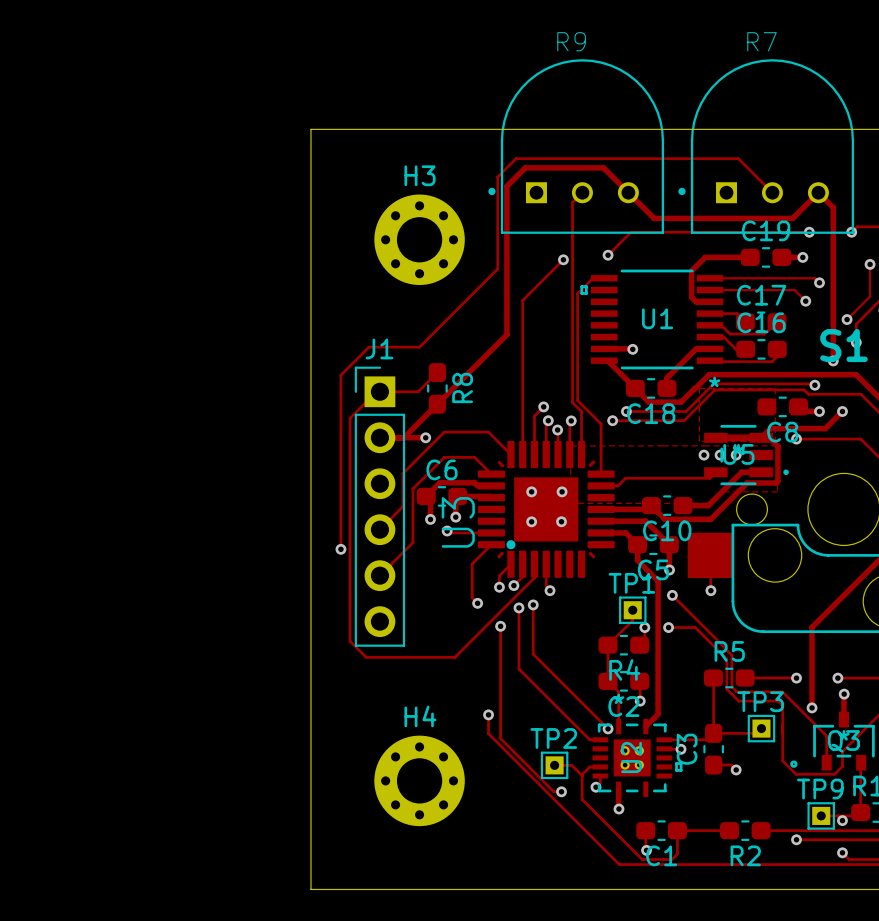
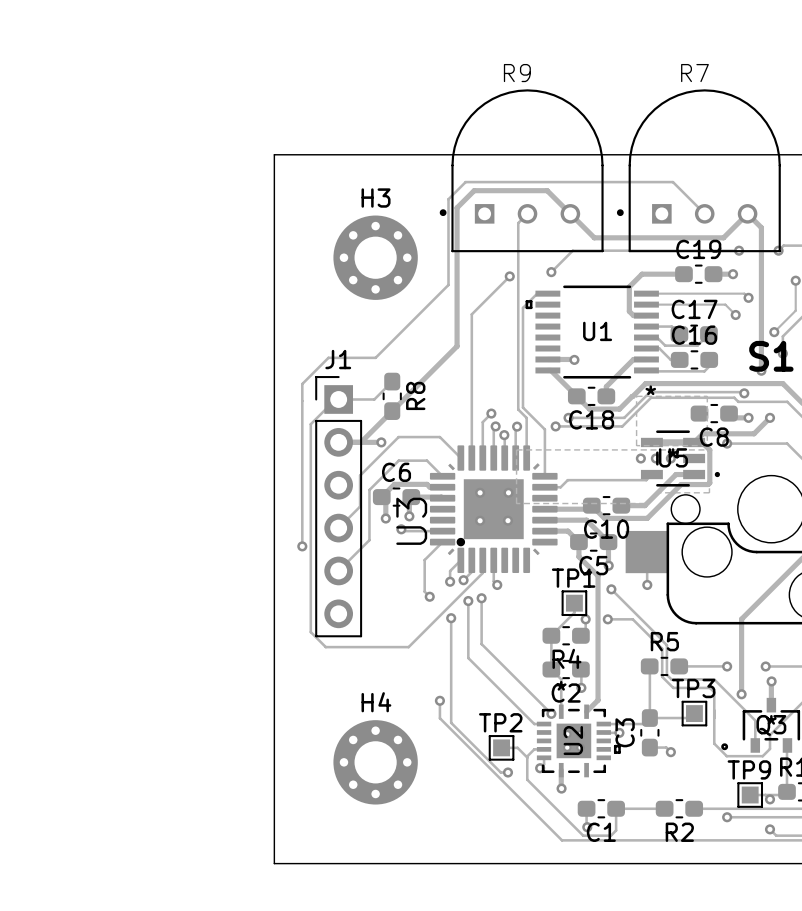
TP1 footprint: [619, 596, 647, 624] -> [561, 590, 588, 617]
TP3 footprint: [747, 714, 776, 743] -> [681, 700, 708, 727]
TP2 footprint: [540, 751, 569, 780] -> [488, 735, 515, 761]
TP9 footprint: [807, 802, 835, 830] -> [737, 782, 764, 808]

